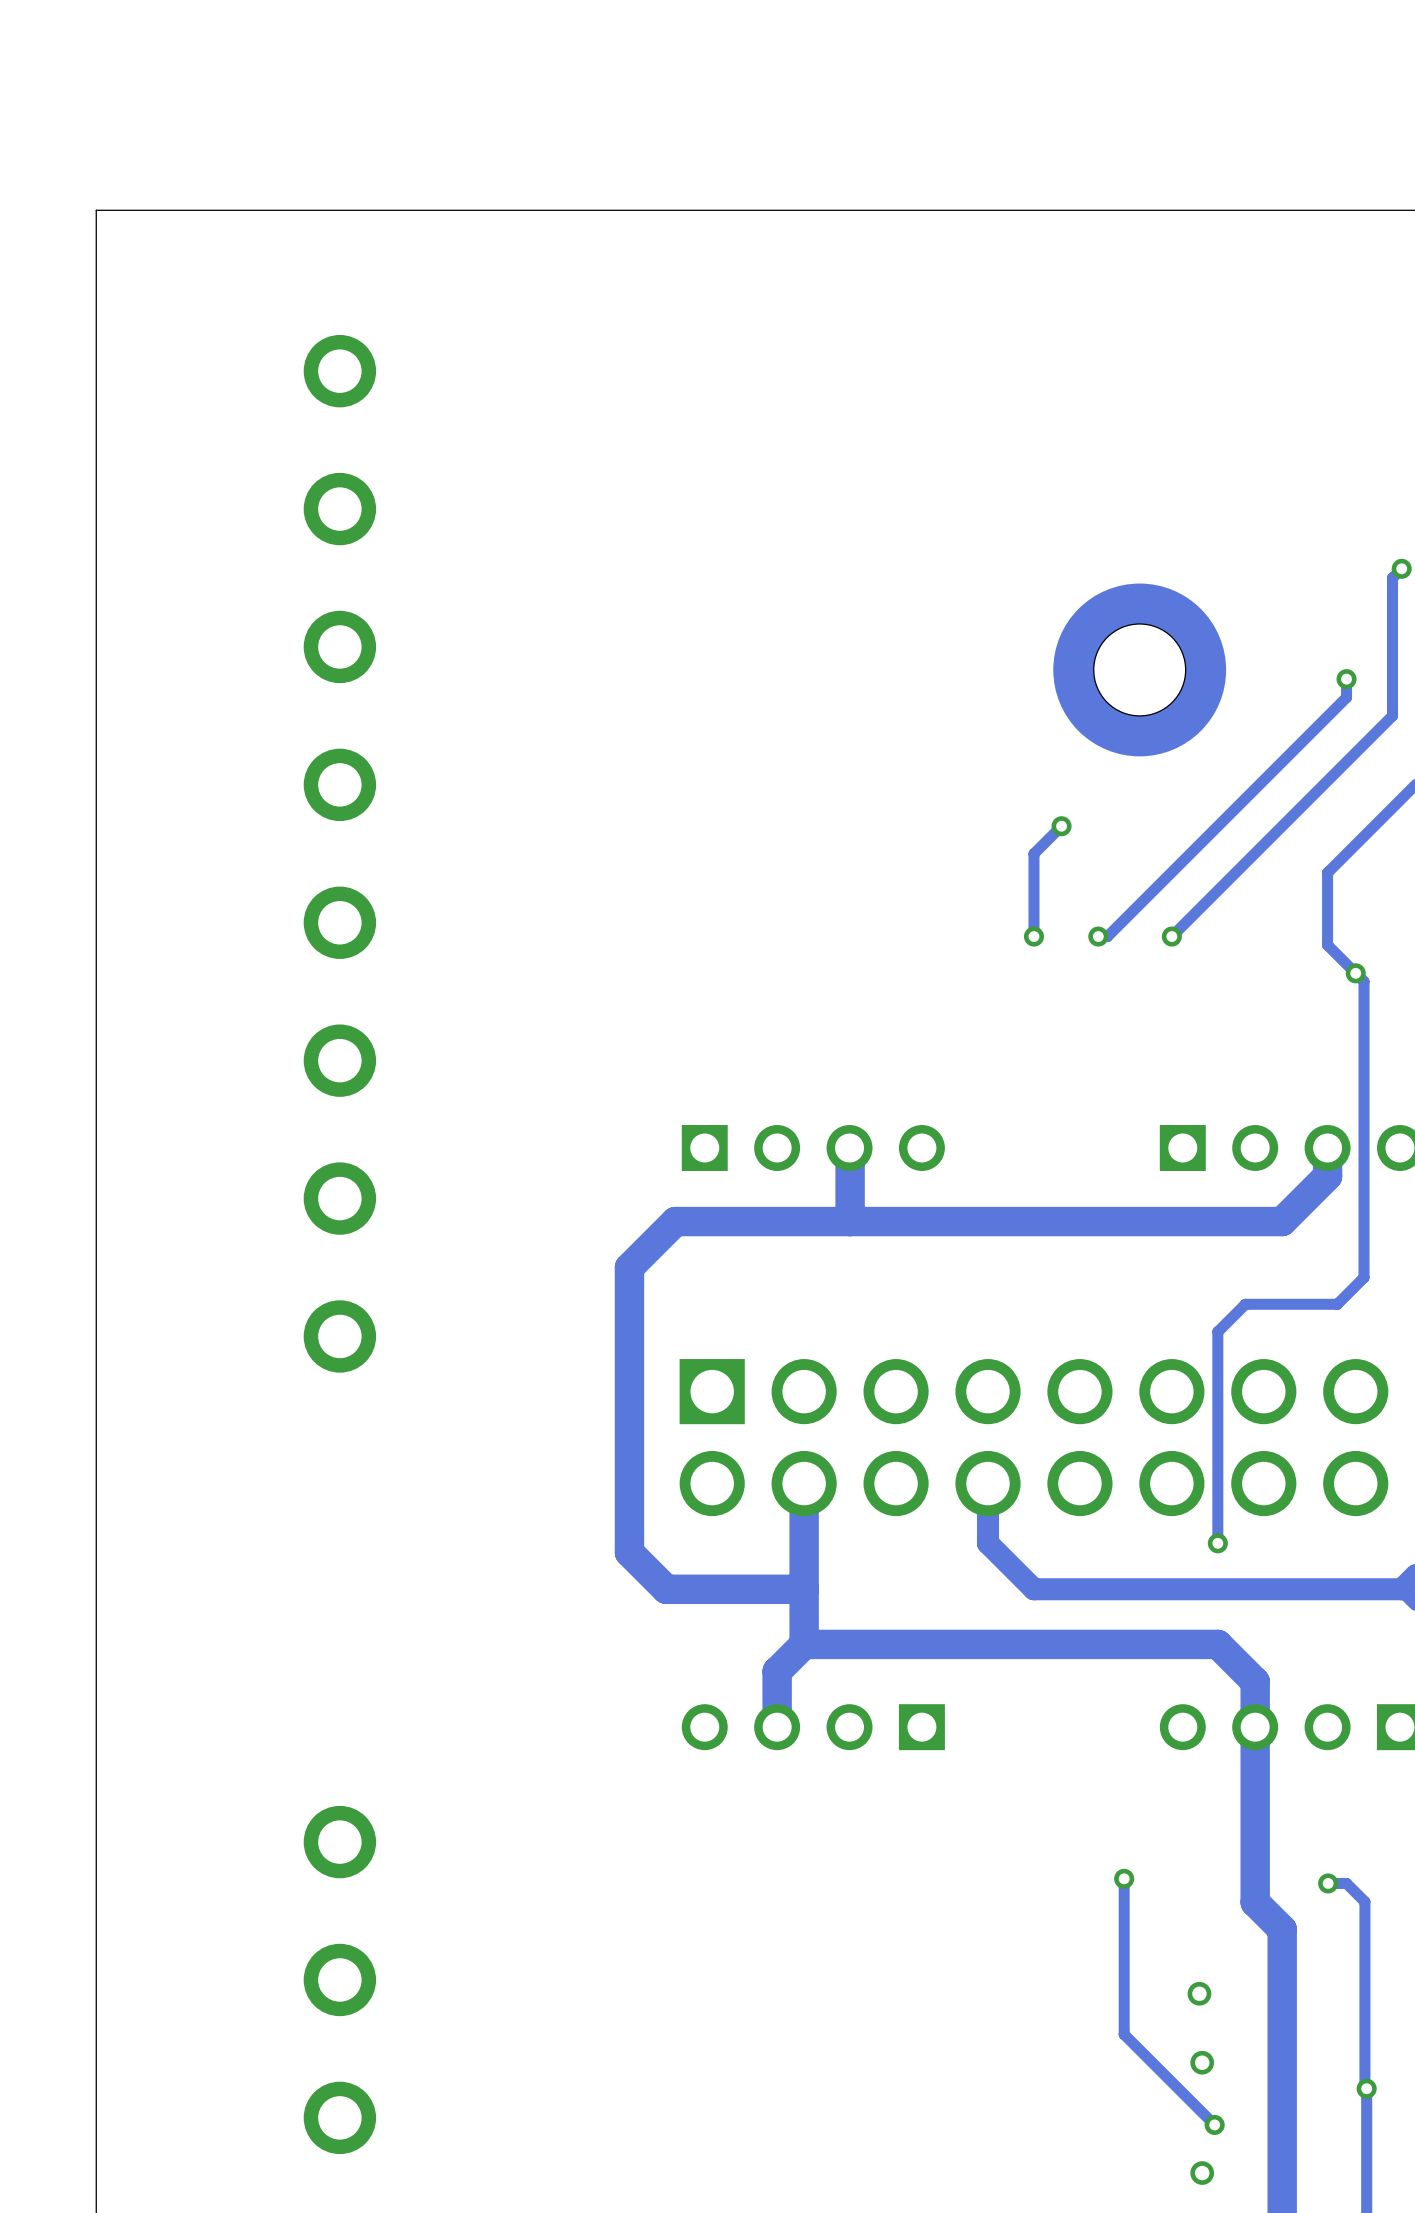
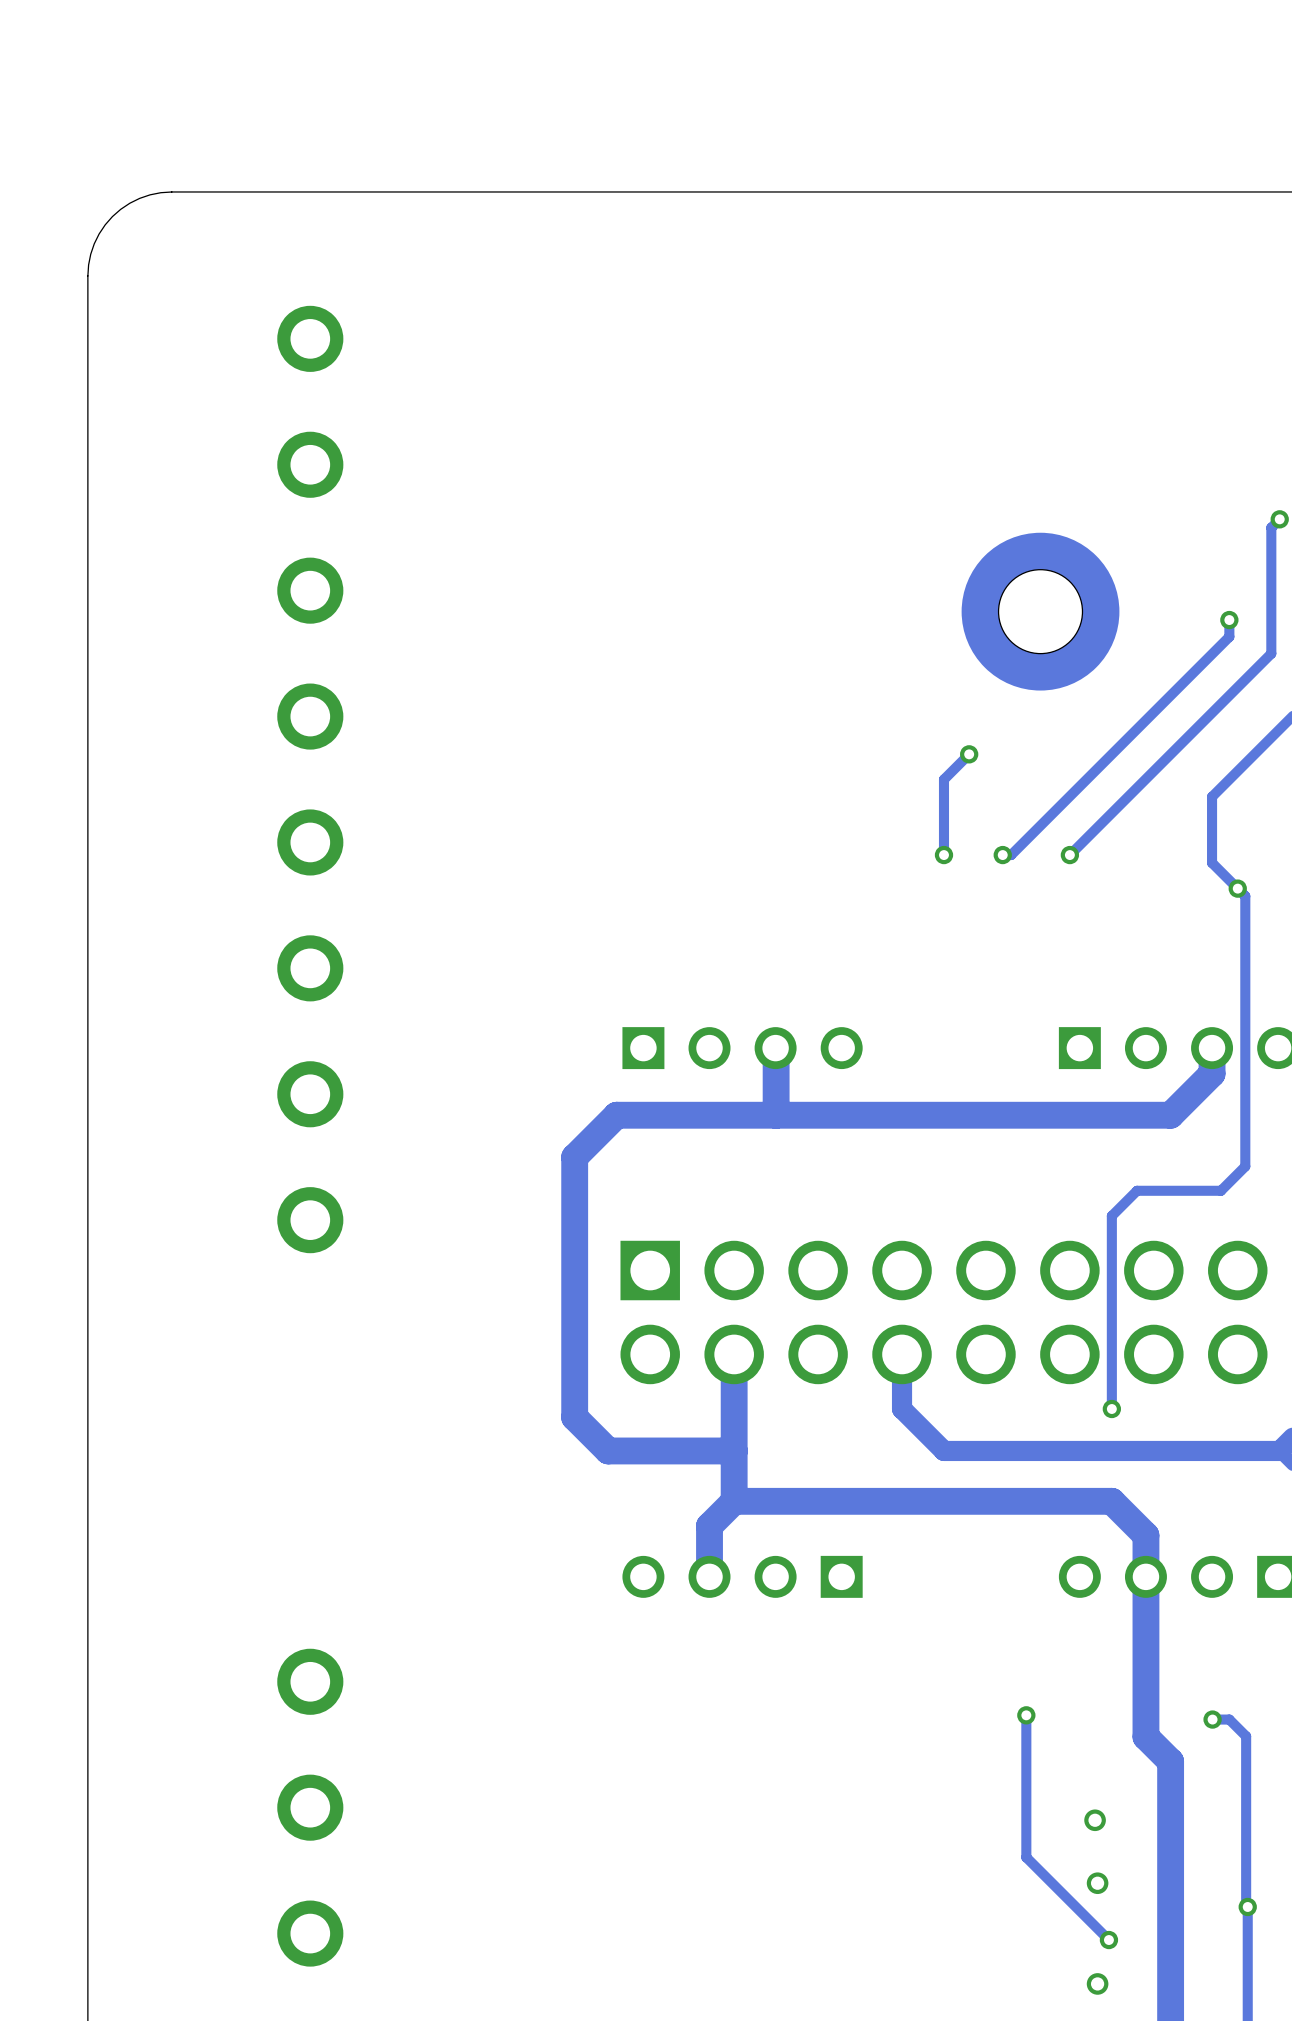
board edge: (188, 210) (96, 210) (96, 302) -> (171, 191) (139, 198) (112, 216) (94, 243) (87, 275)

